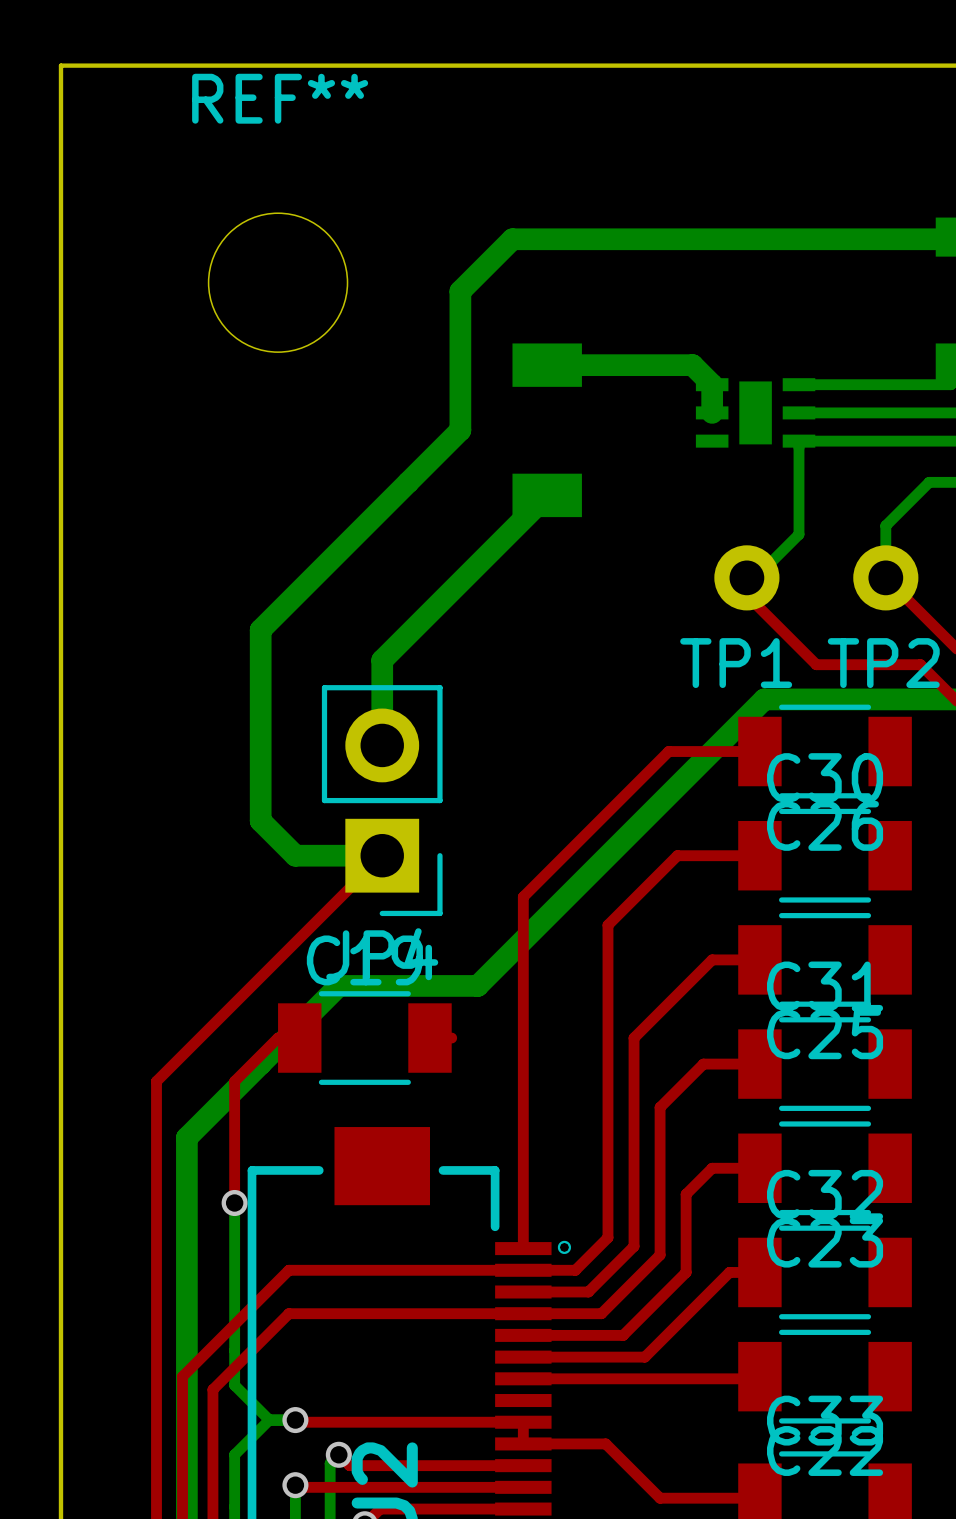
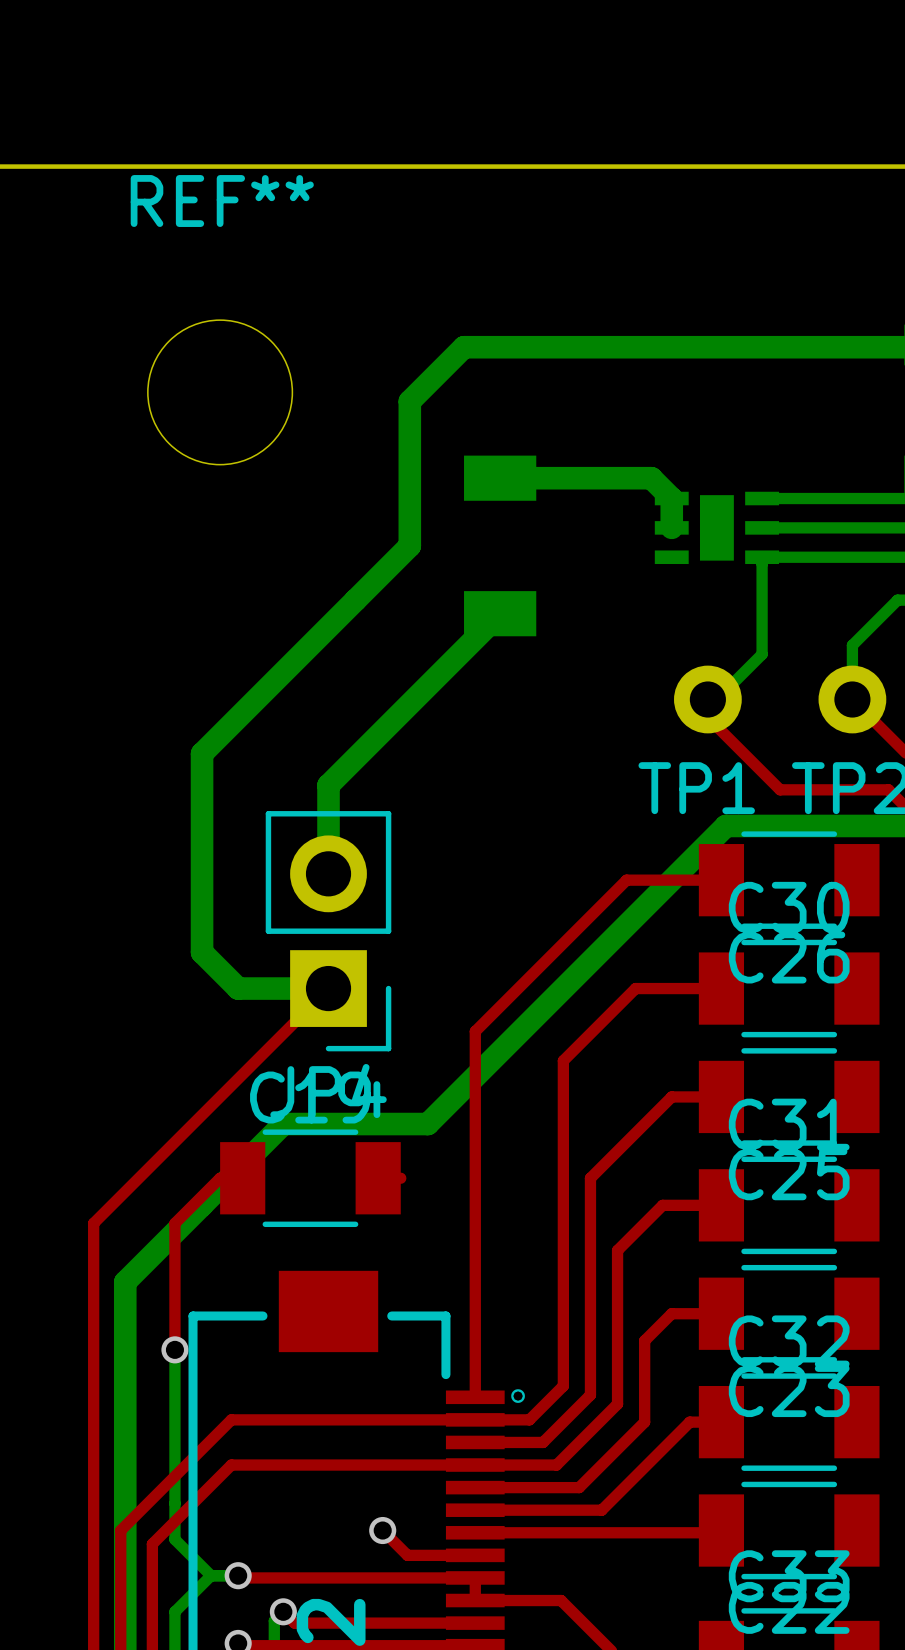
top track: none -> (382, 1530) (407, 1555) (475, 1555)
via: none -> (382, 1530)

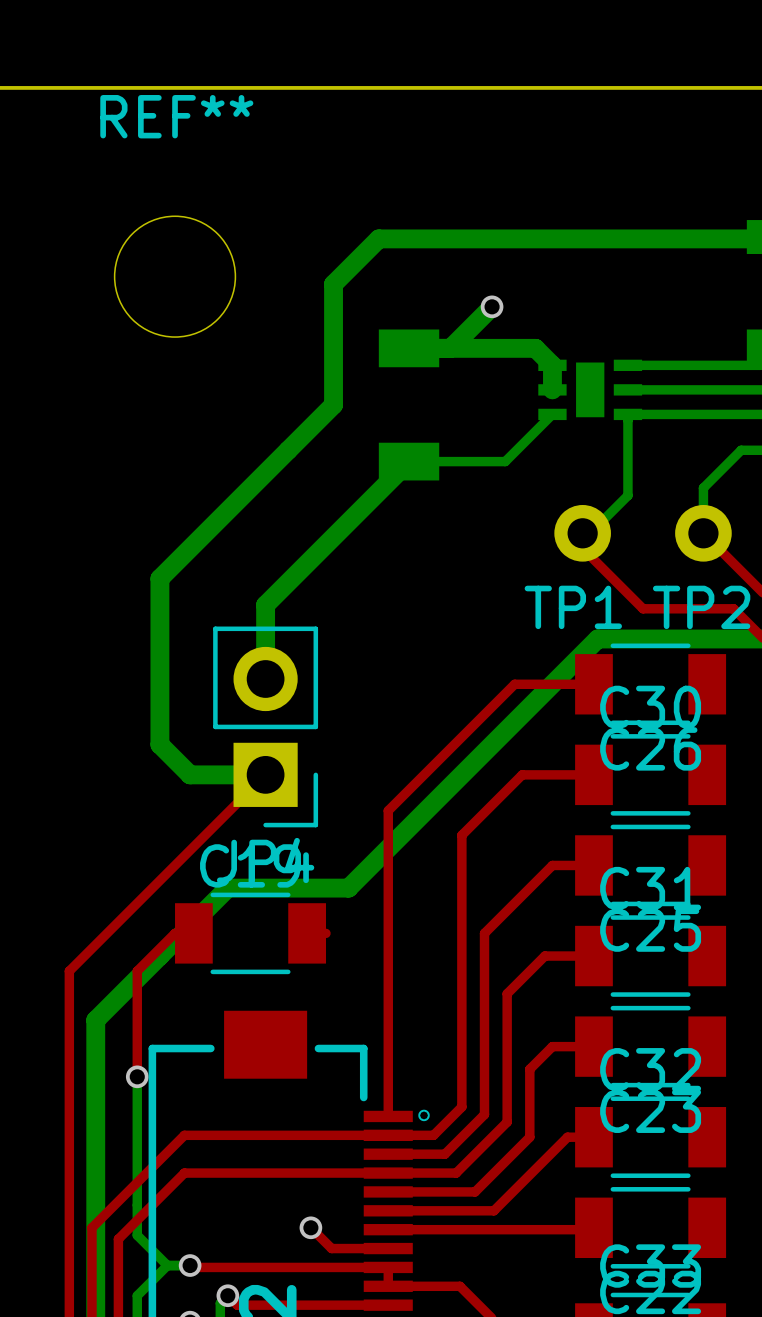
bottom track: none -> (492, 306) (450, 348)
via: none -> (492, 306)
bottom track: none -> (552, 414) (505, 461) (409, 461)

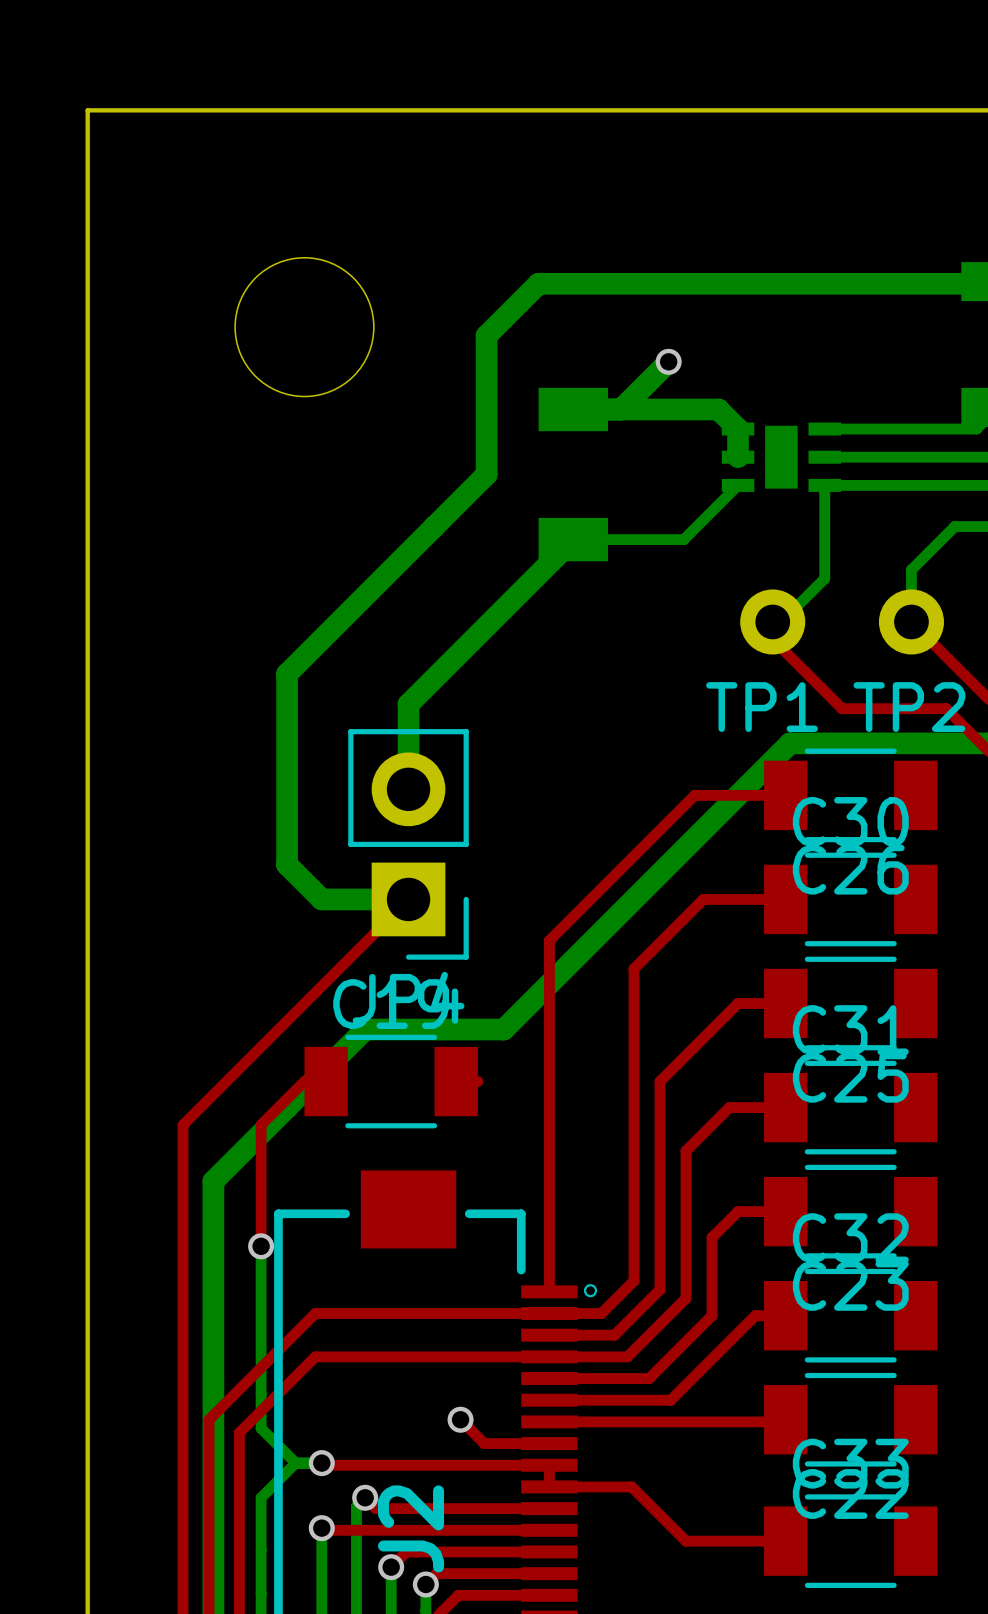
REF** name: REF** (176, 116) -> none

